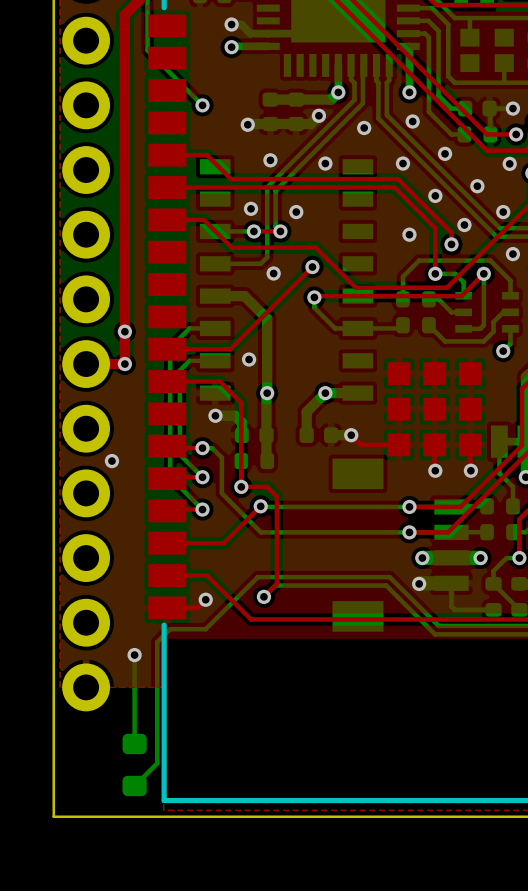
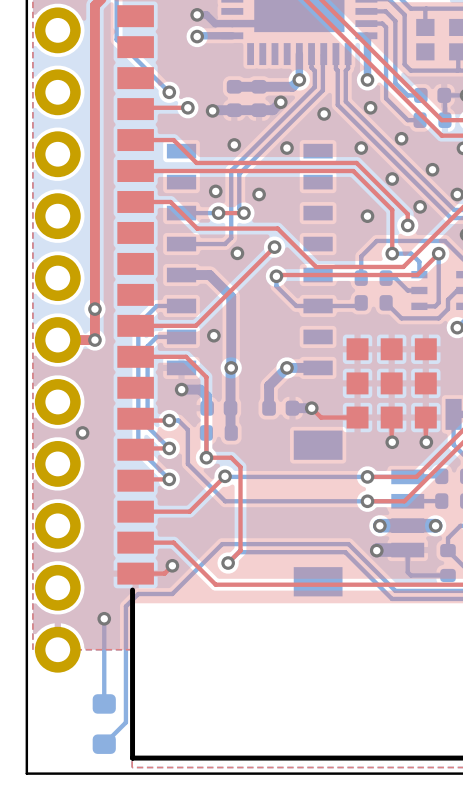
top track: none -> (187, 107) (135, 109)
via: none -> (187, 107)

